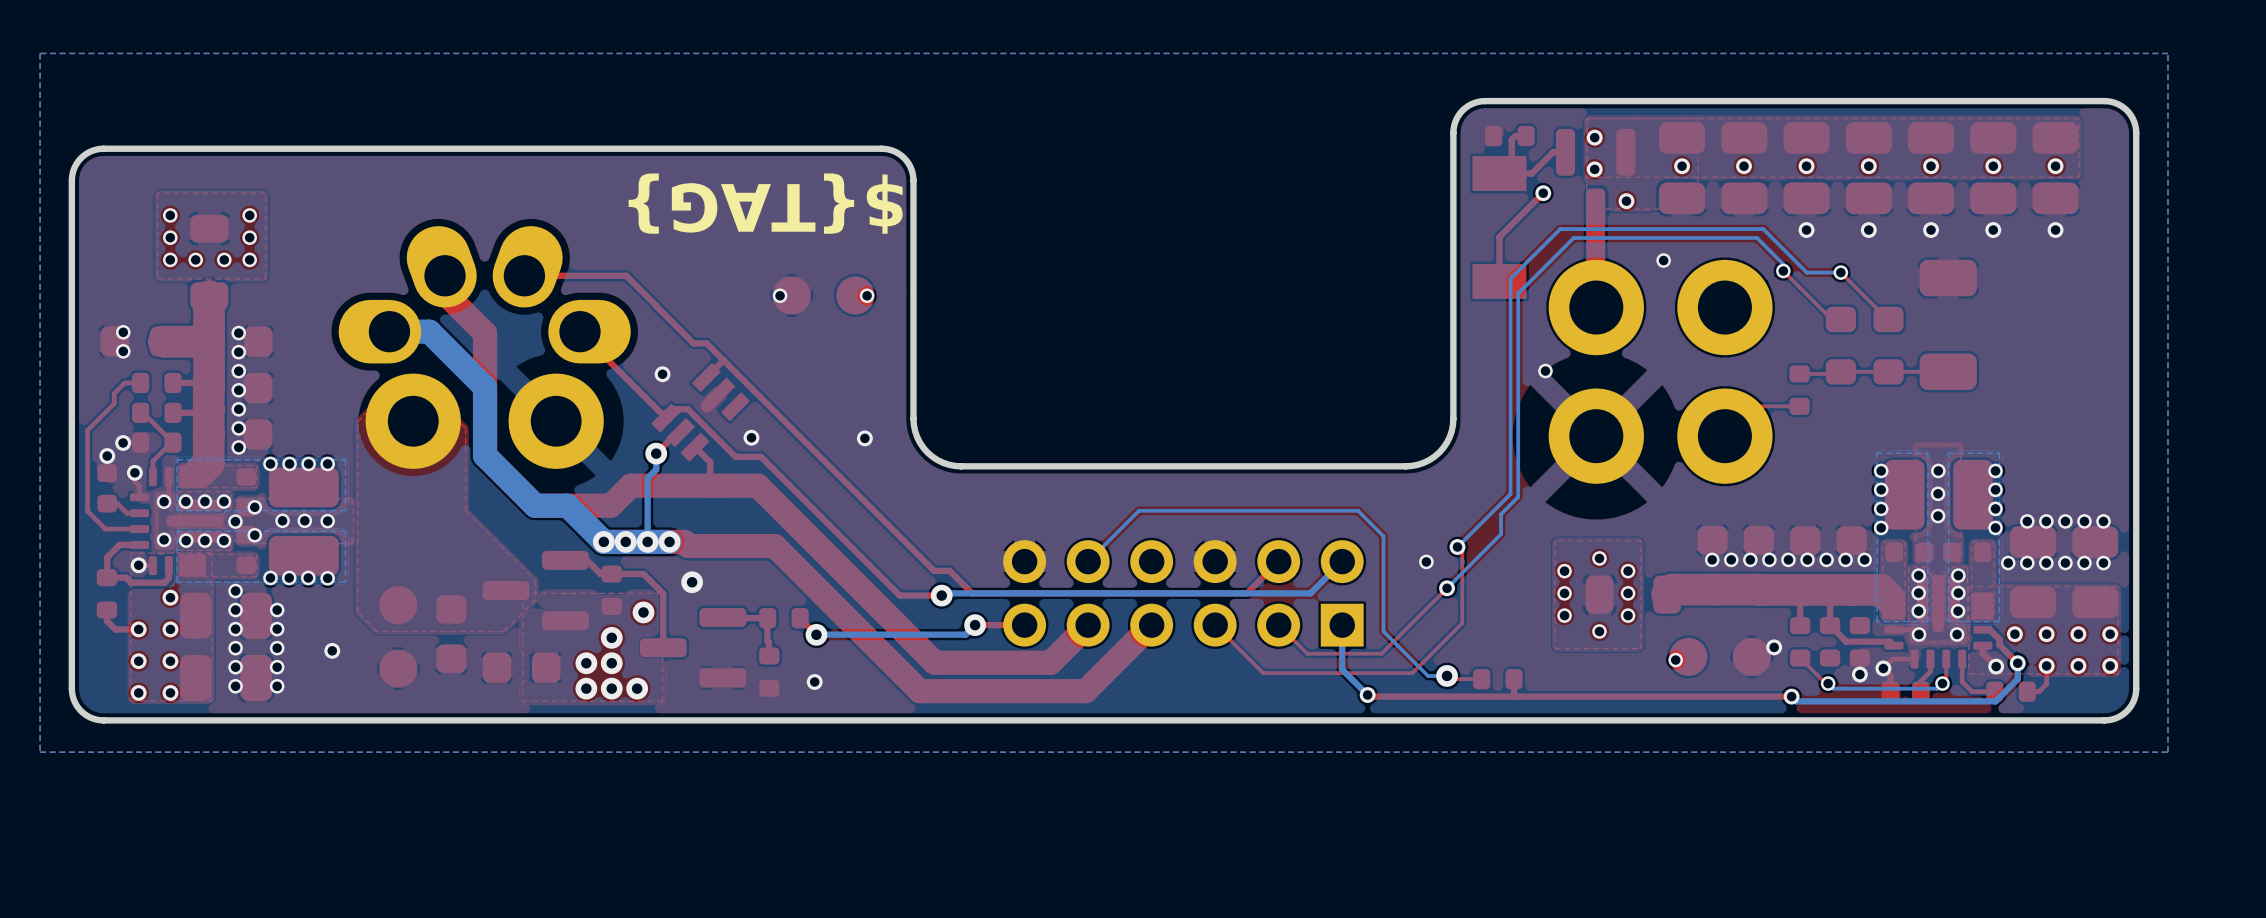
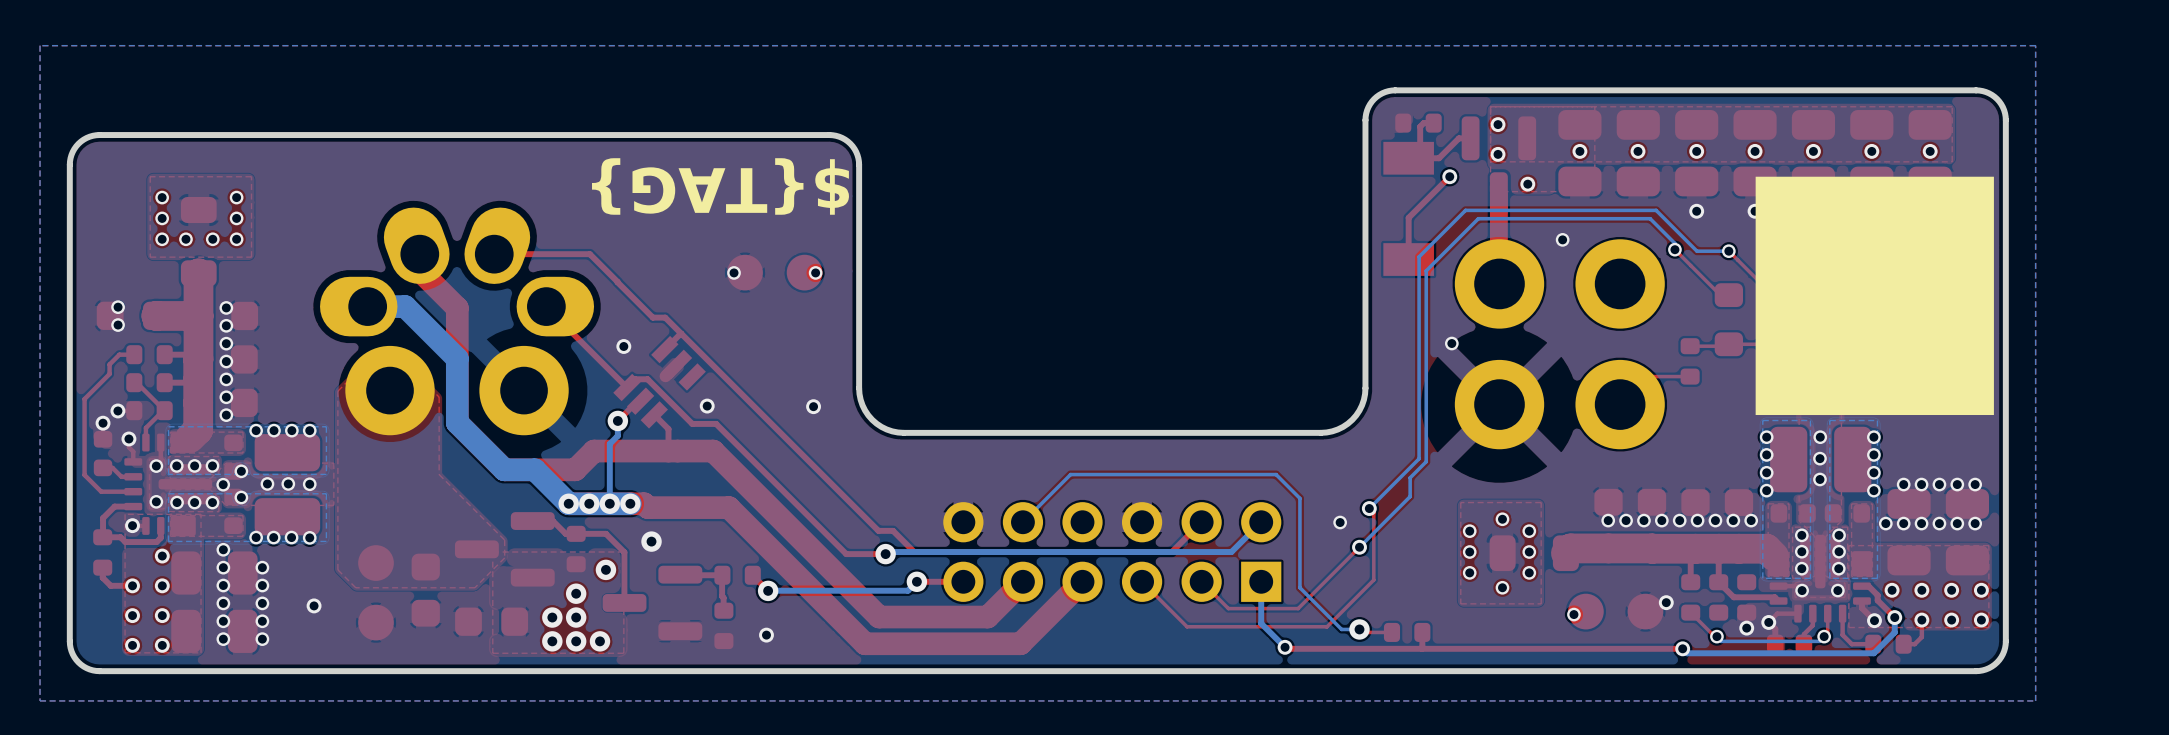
drawing: none -> [1755, 176, 1994, 416]

